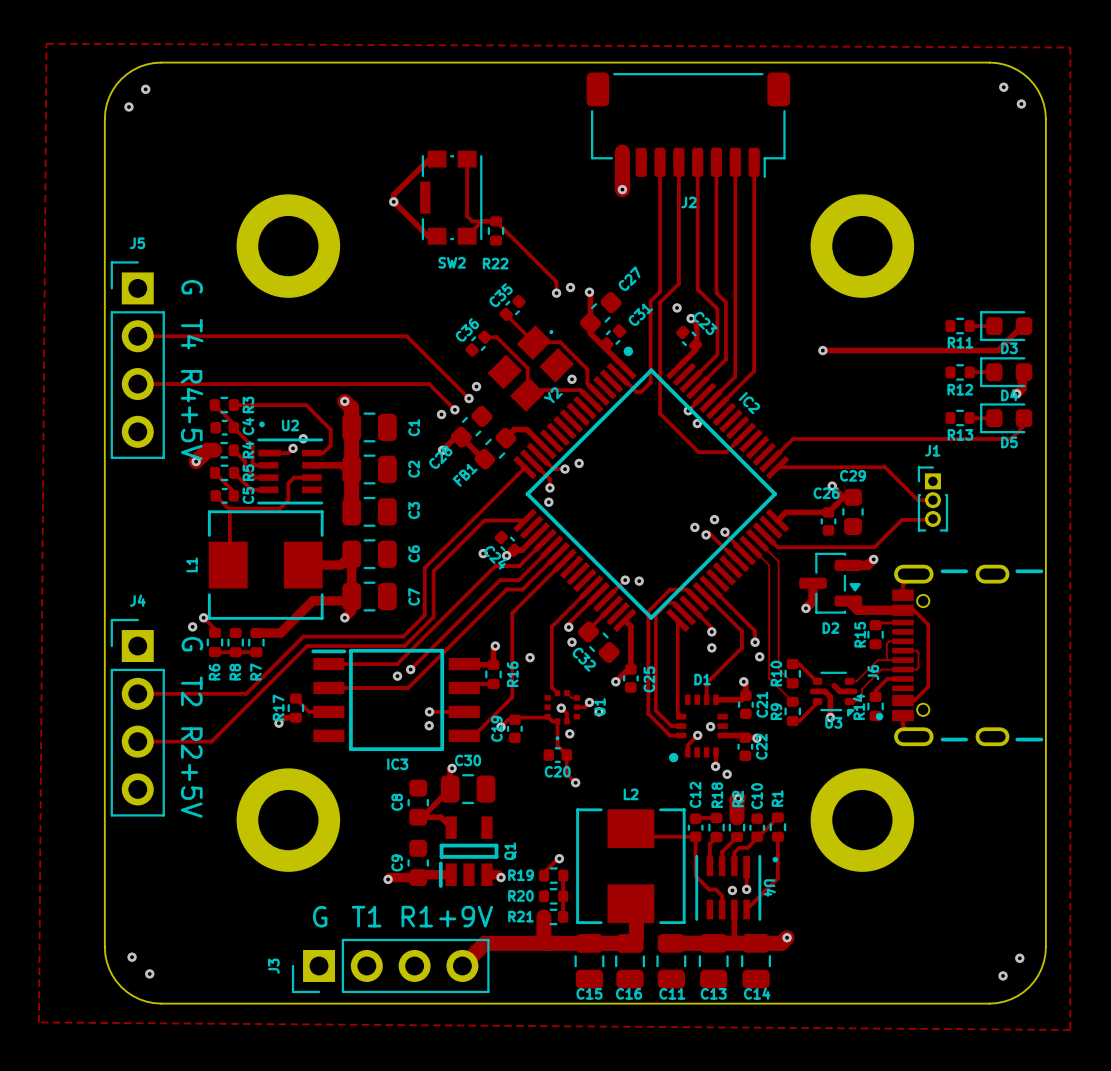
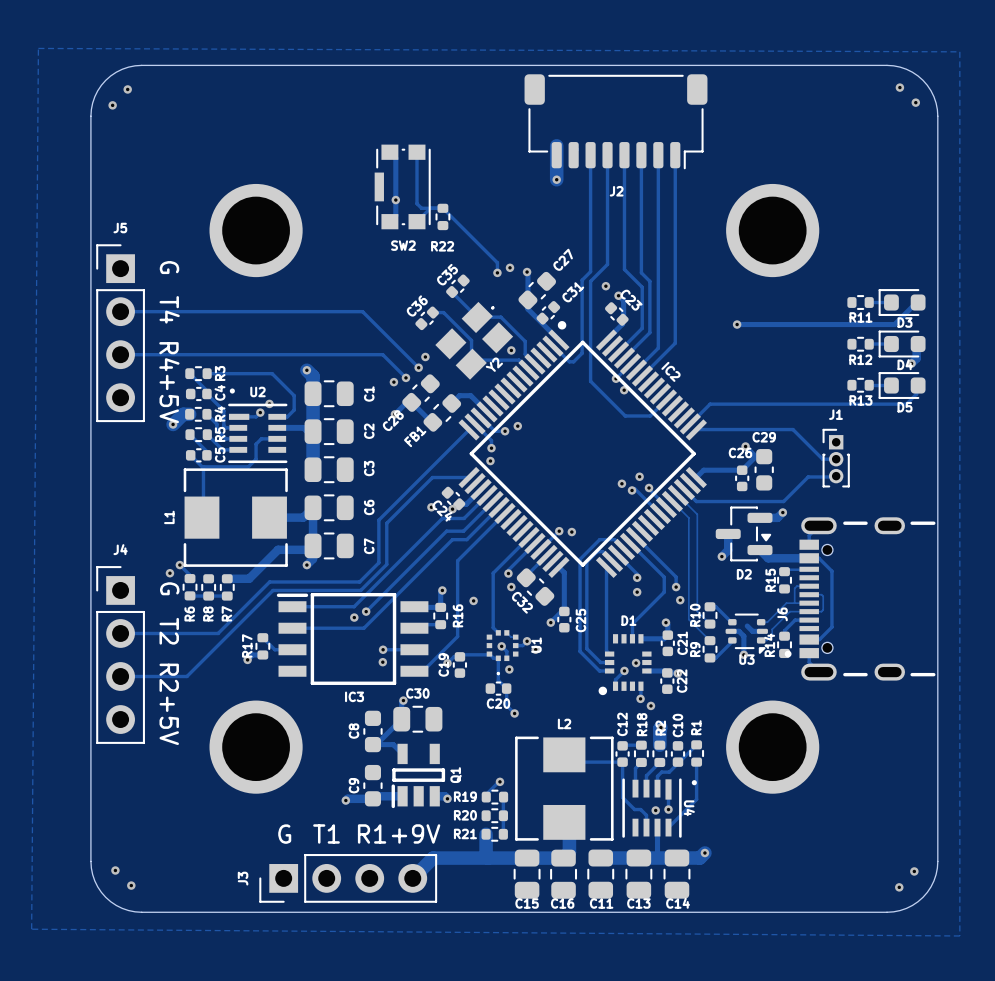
track: (437, 159) (429, 159) (393, 194) (393, 201) (428, 236) (437, 236) -> (389, 152) (395, 158) (395, 215) (389, 221)
part footprint: [236, 194, 341, 298] -> [209, 183, 303, 278]
part footprint: [810, 194, 915, 298] -> [726, 183, 820, 278]
via position: (393, 201) -> (395, 200)
part footprint: [236, 768, 341, 872] -> [209, 700, 303, 794]
part footprint: [810, 768, 915, 872] -> [726, 700, 820, 794]

